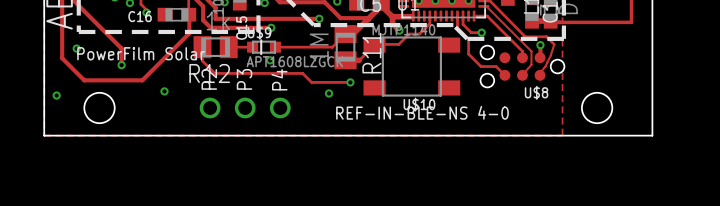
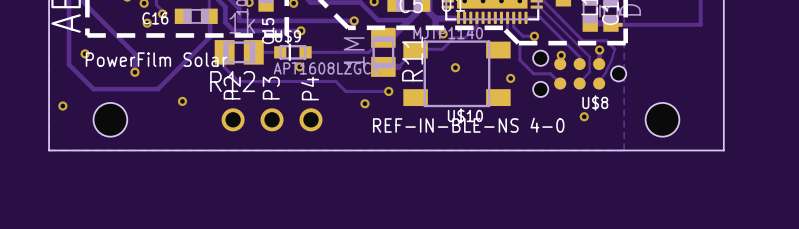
via: none -> (147, 23)
via: none -> (561, 55)
via: none -> (455, 67)
via: none -> (510, 78)
via: none -> (584, 116)

